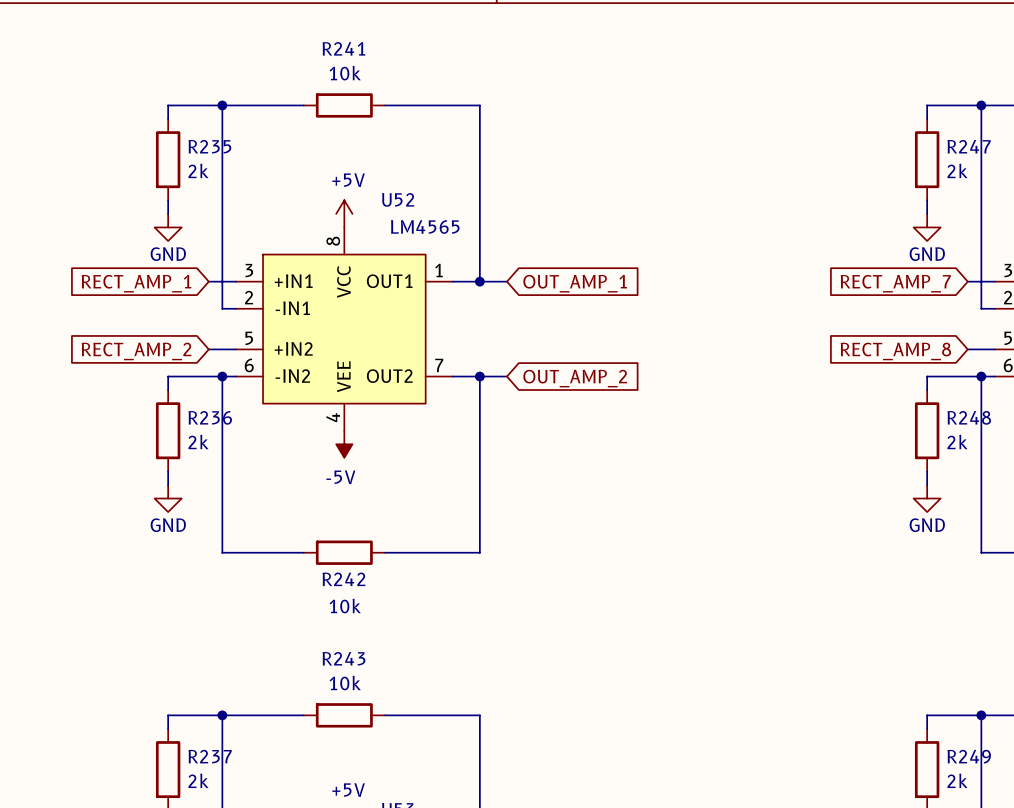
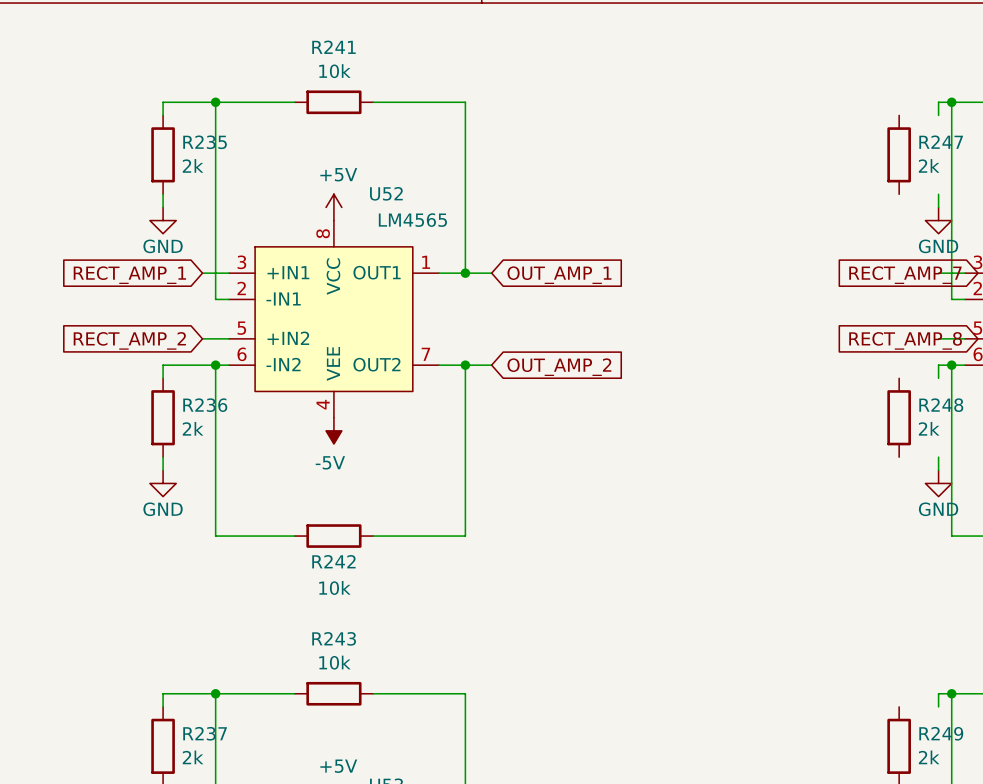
wire: (967, 105) (927, 105) (927, 119) -> (938, 102) (938, 115)
wire: (927, 200) (927, 213) -> (938, 194) (938, 207)
power symbol position: GND (927, 227) -> GND (938, 220)
global label position: RECT_AMP_7 (895, 283) -> RECT_AMP_7 (905, 275)
global label position: RECT_AMP_8 (895, 351) -> RECT_AMP_8 (905, 340)
wire: (967, 376) (927, 376) (927, 390) -> (938, 365) (938, 378)
wire: (927, 471) (927, 484) -> (938, 457) (938, 470)
power symbol position: GND (927, 498) -> GND (938, 483)
wire: (967, 715) (927, 715) (927, 728) -> (938, 693) (938, 706)

